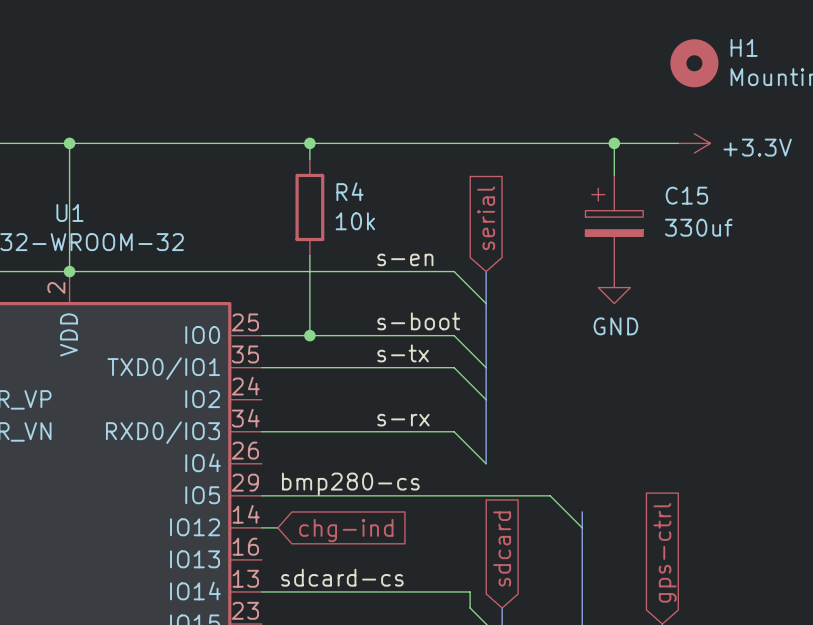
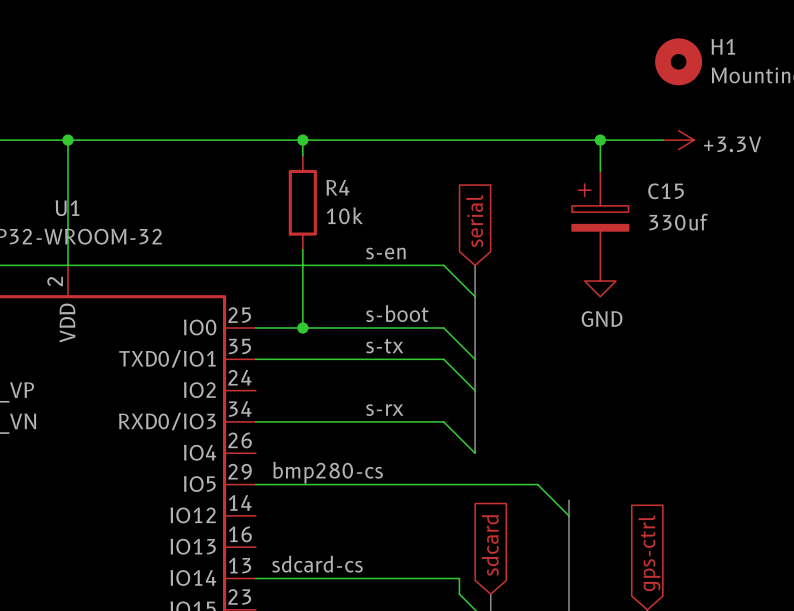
junction: (69, 271) -> none
wire: (261, 527) (277, 527) -> none
global label: chg-ind (346, 530) -> none

